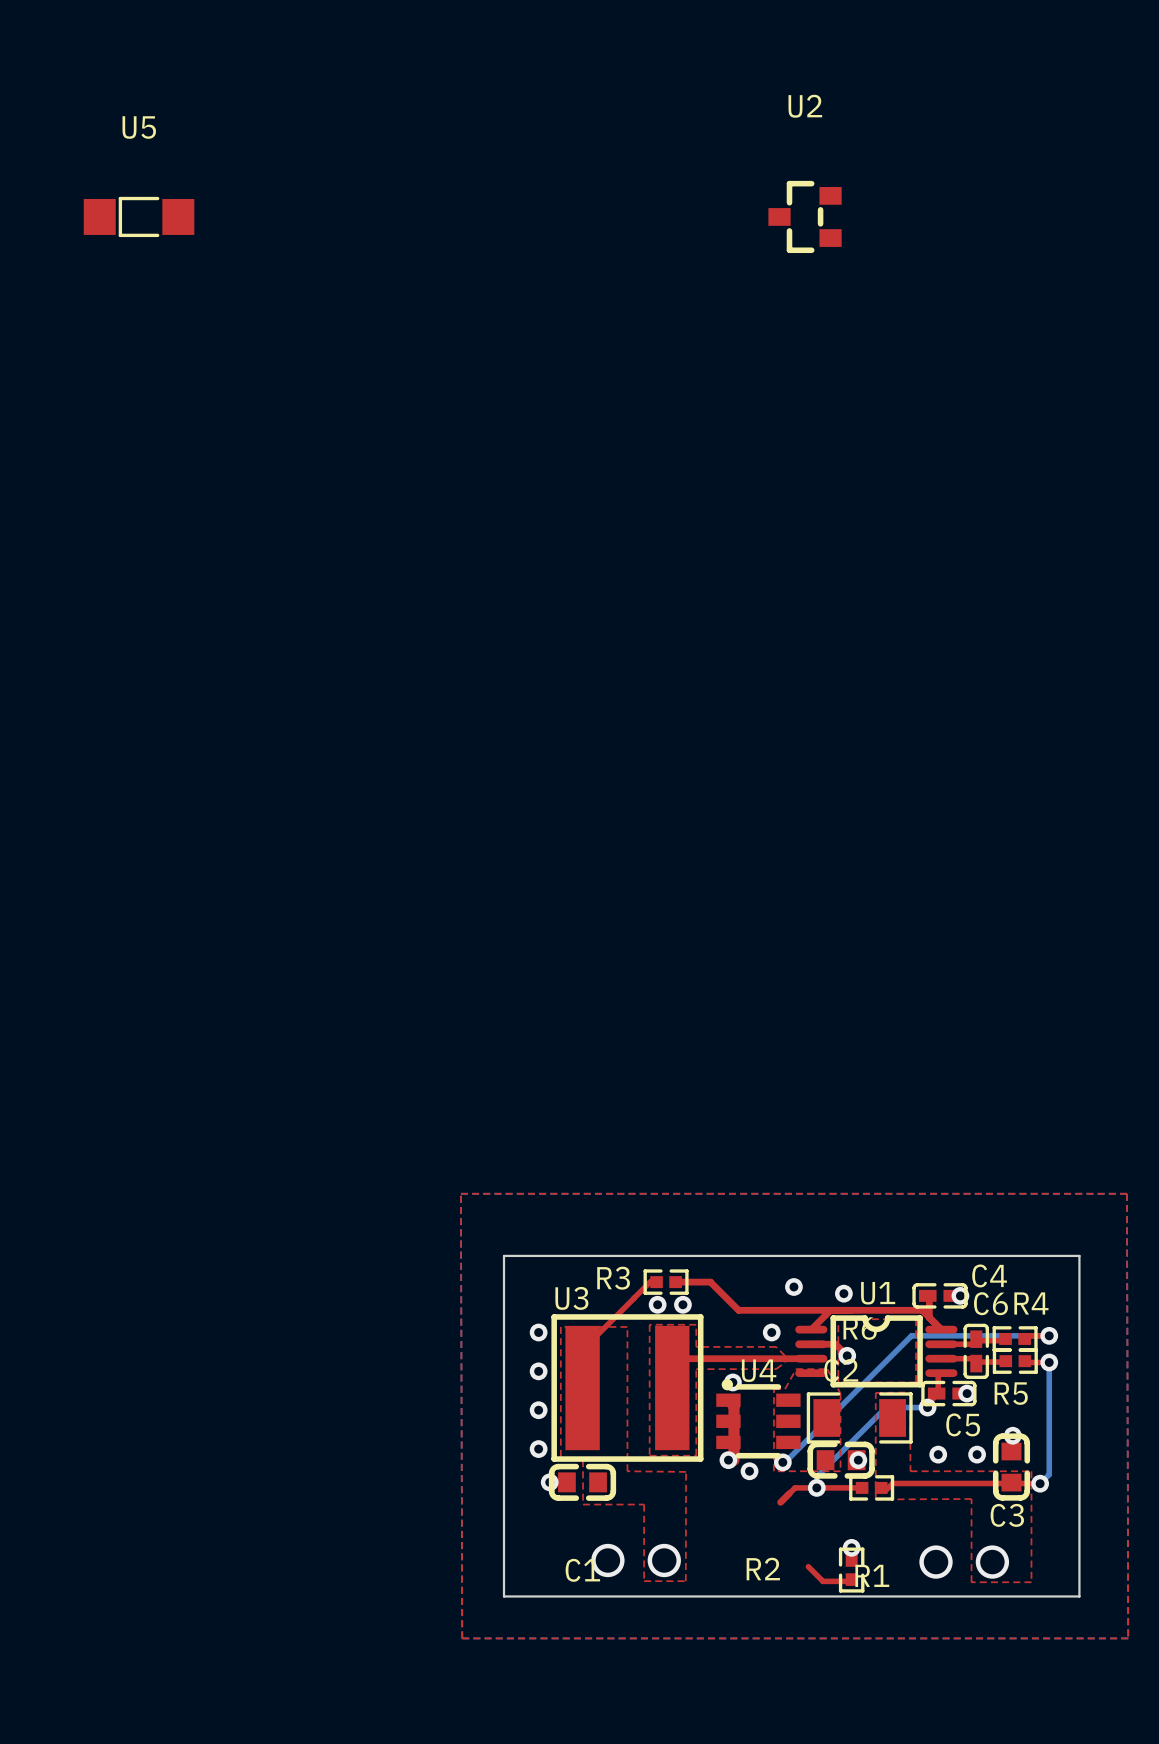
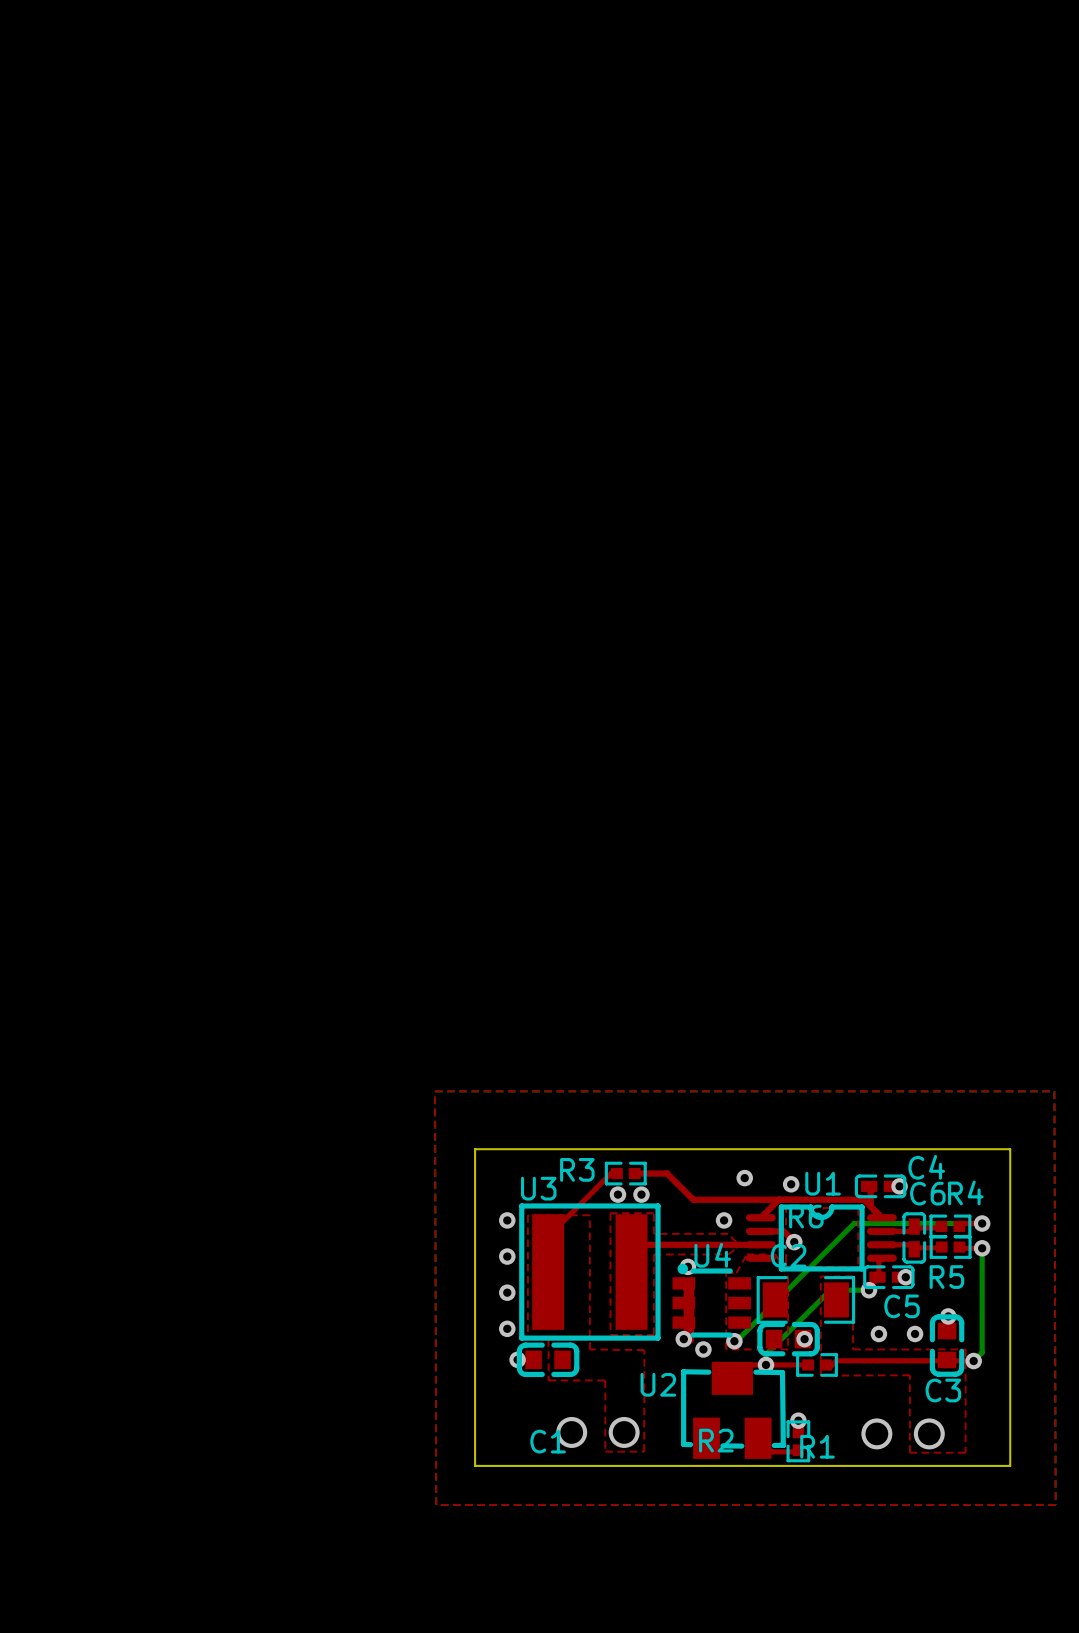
U2 name position: U2 (805, 106) -> U2 (658, 1384)
U2 footprint: [768, 180, 842, 254] -> [681, 1361, 786, 1459]
U5: (139, 216) -> none

